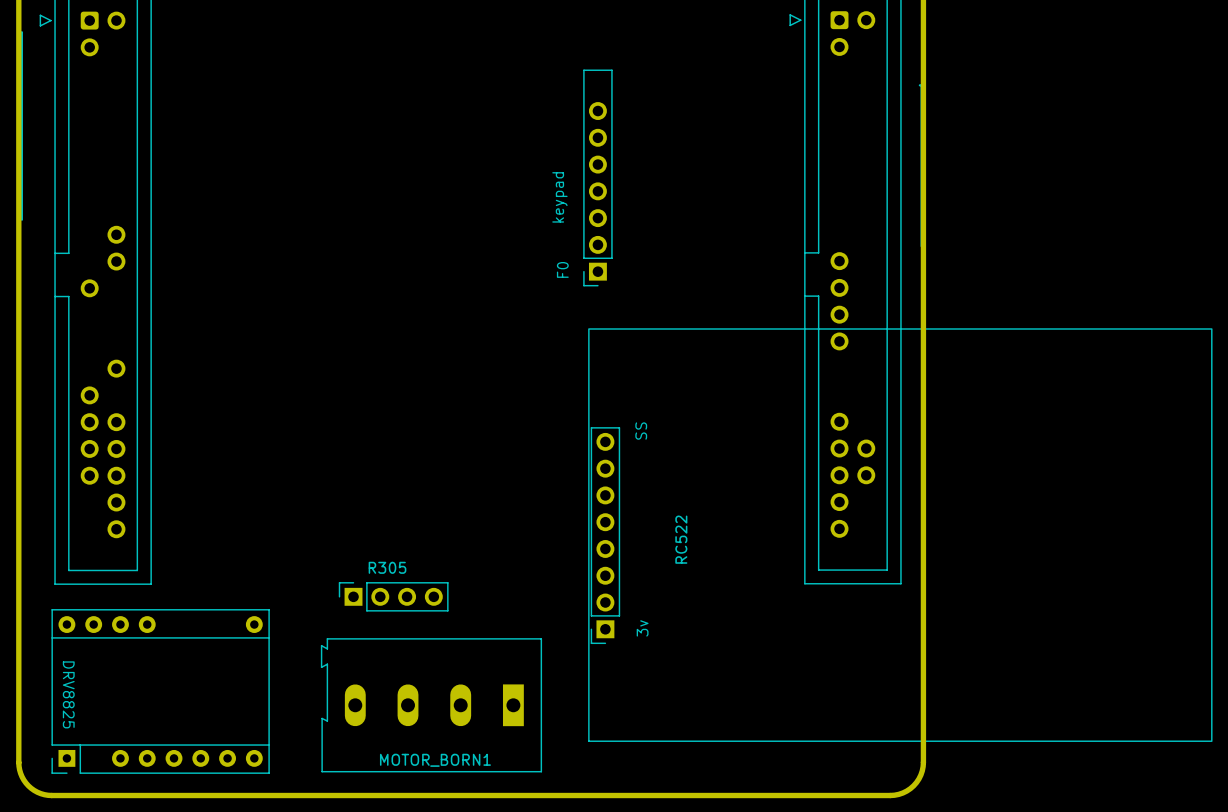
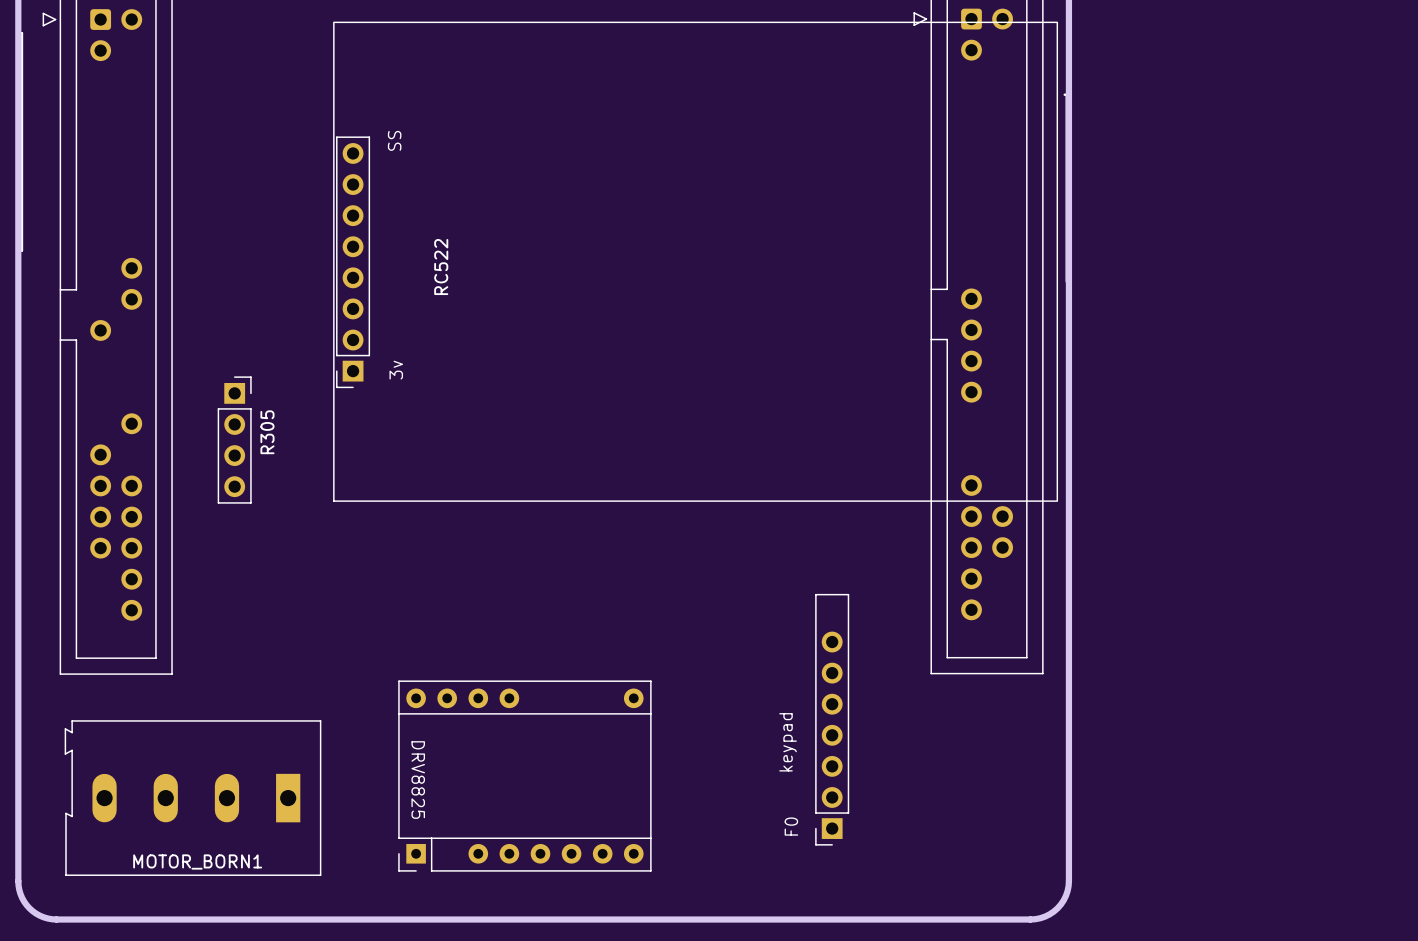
part: (597, 177) -> none
RC522 position: (900, 535) -> (695, 261)
R305 rotation: 0° (393, 596) -> 90° clockwise (234, 440)
R305 position: (393, 596) -> (234, 440)
part: none -> (832, 719)
part: none -> (524, 776)
part: (160, 691) -> none
MOTOR_BORN1 position: (431, 705) -> (193, 798)

